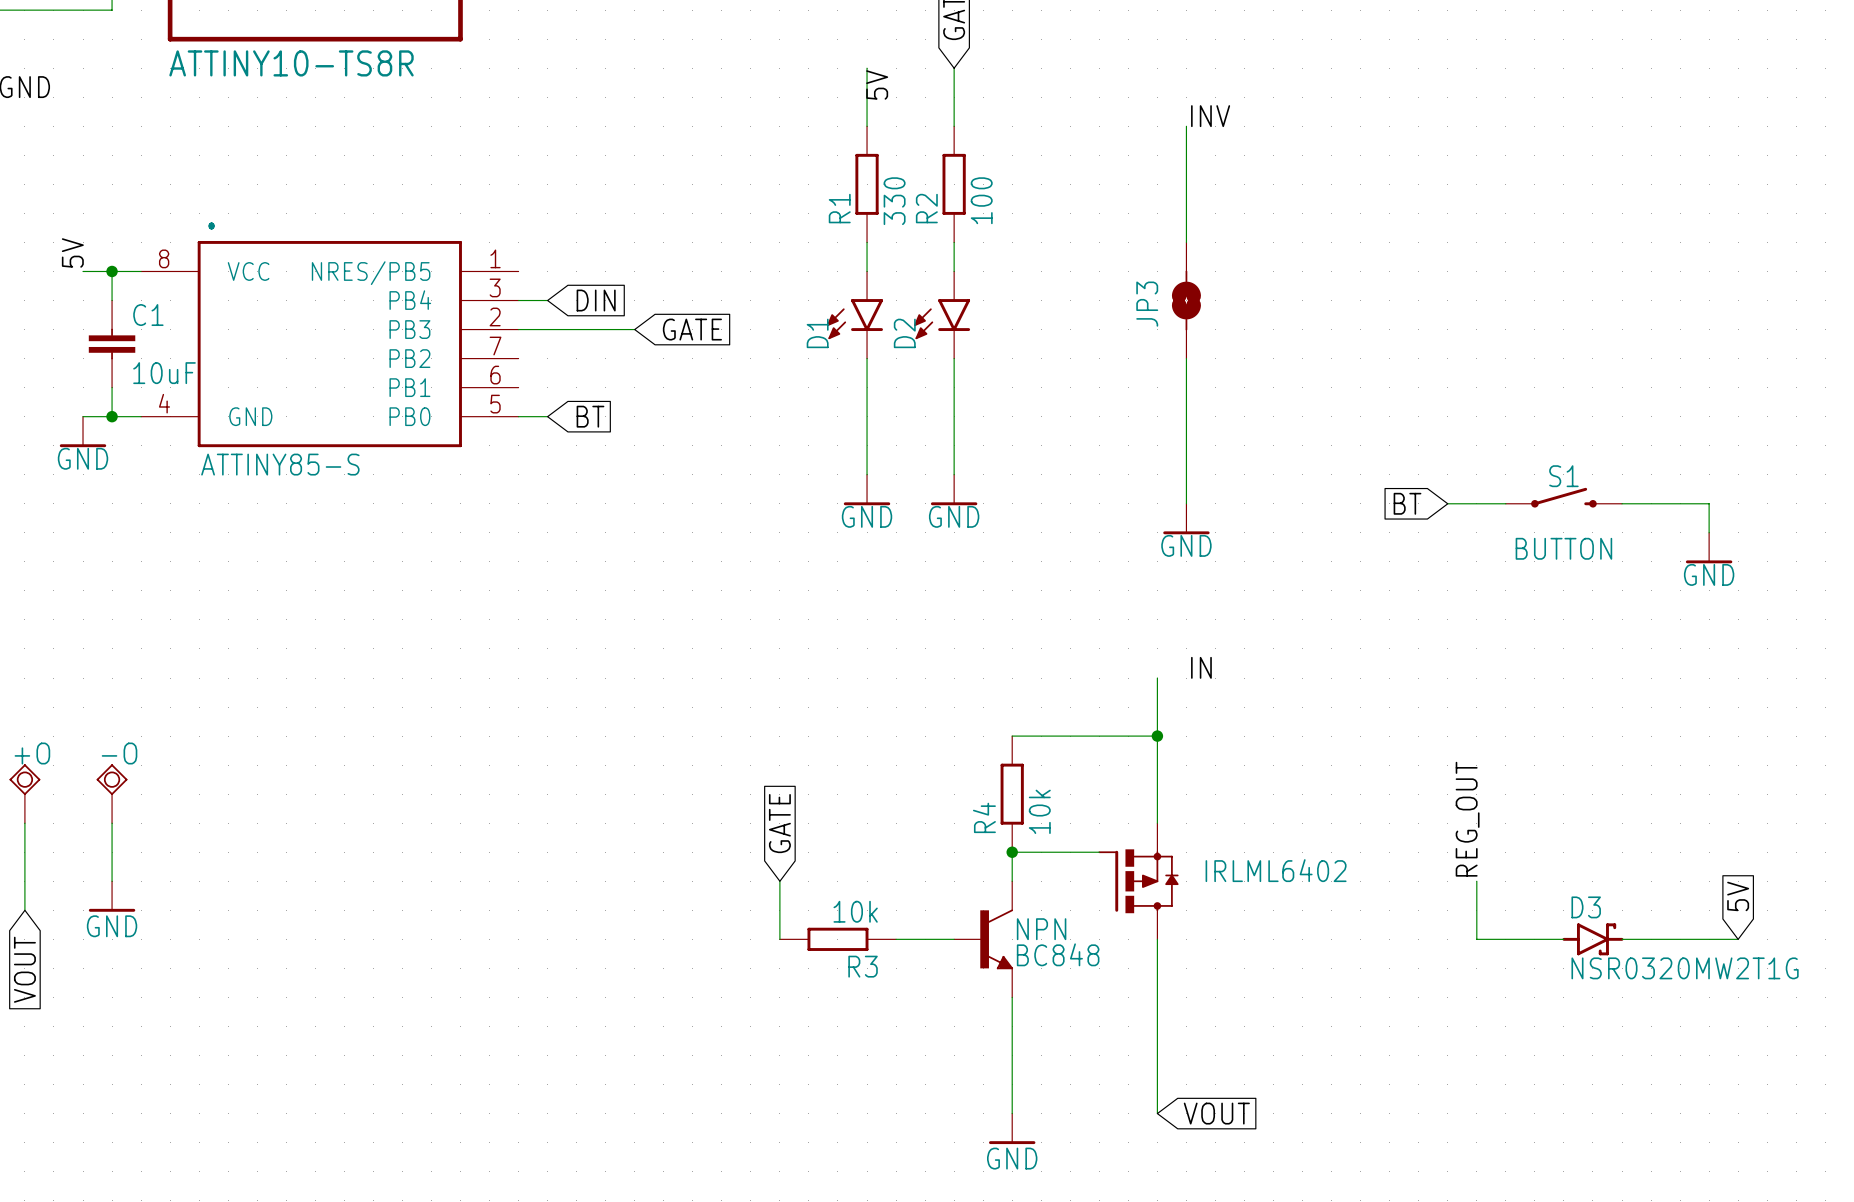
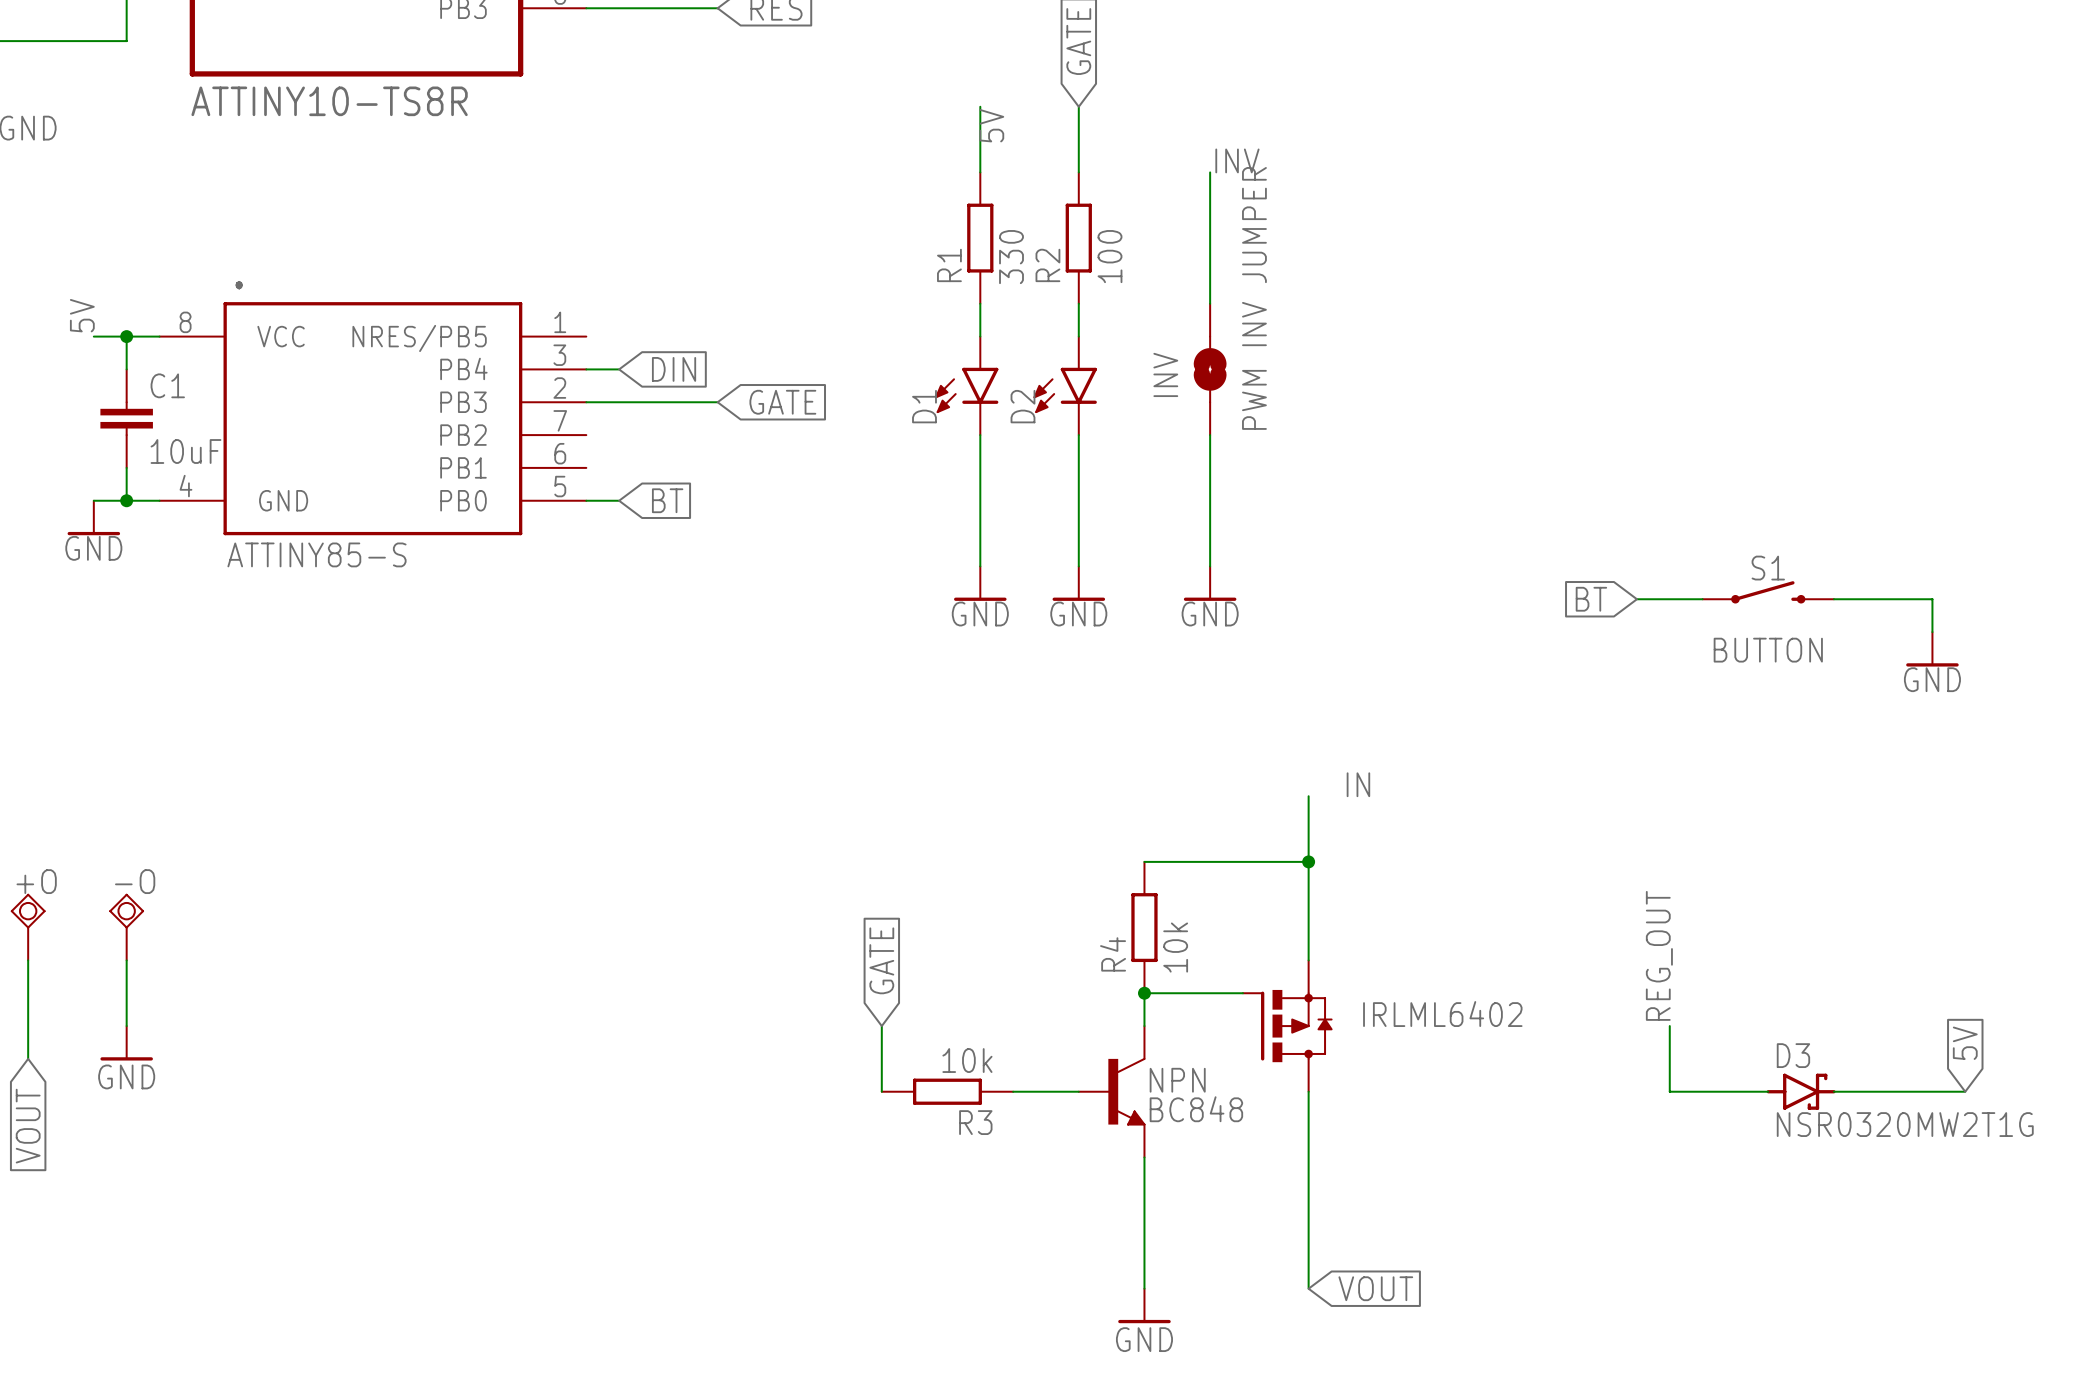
label position: INV (1210, 116) -> INV (1237, 160)
wire: (1186, 126) (1186, 242) -> (1210, 172) (1210, 303)
INV: none -> PWM INV JUMPER (1210, 369)
JP3: (1186, 300) -> none
wire: none -> (1210, 435) (1210, 566)
wire: (1186, 358) (1186, 503) -> none
power symbol position: GND (1186, 519) -> GND (1210, 583)

